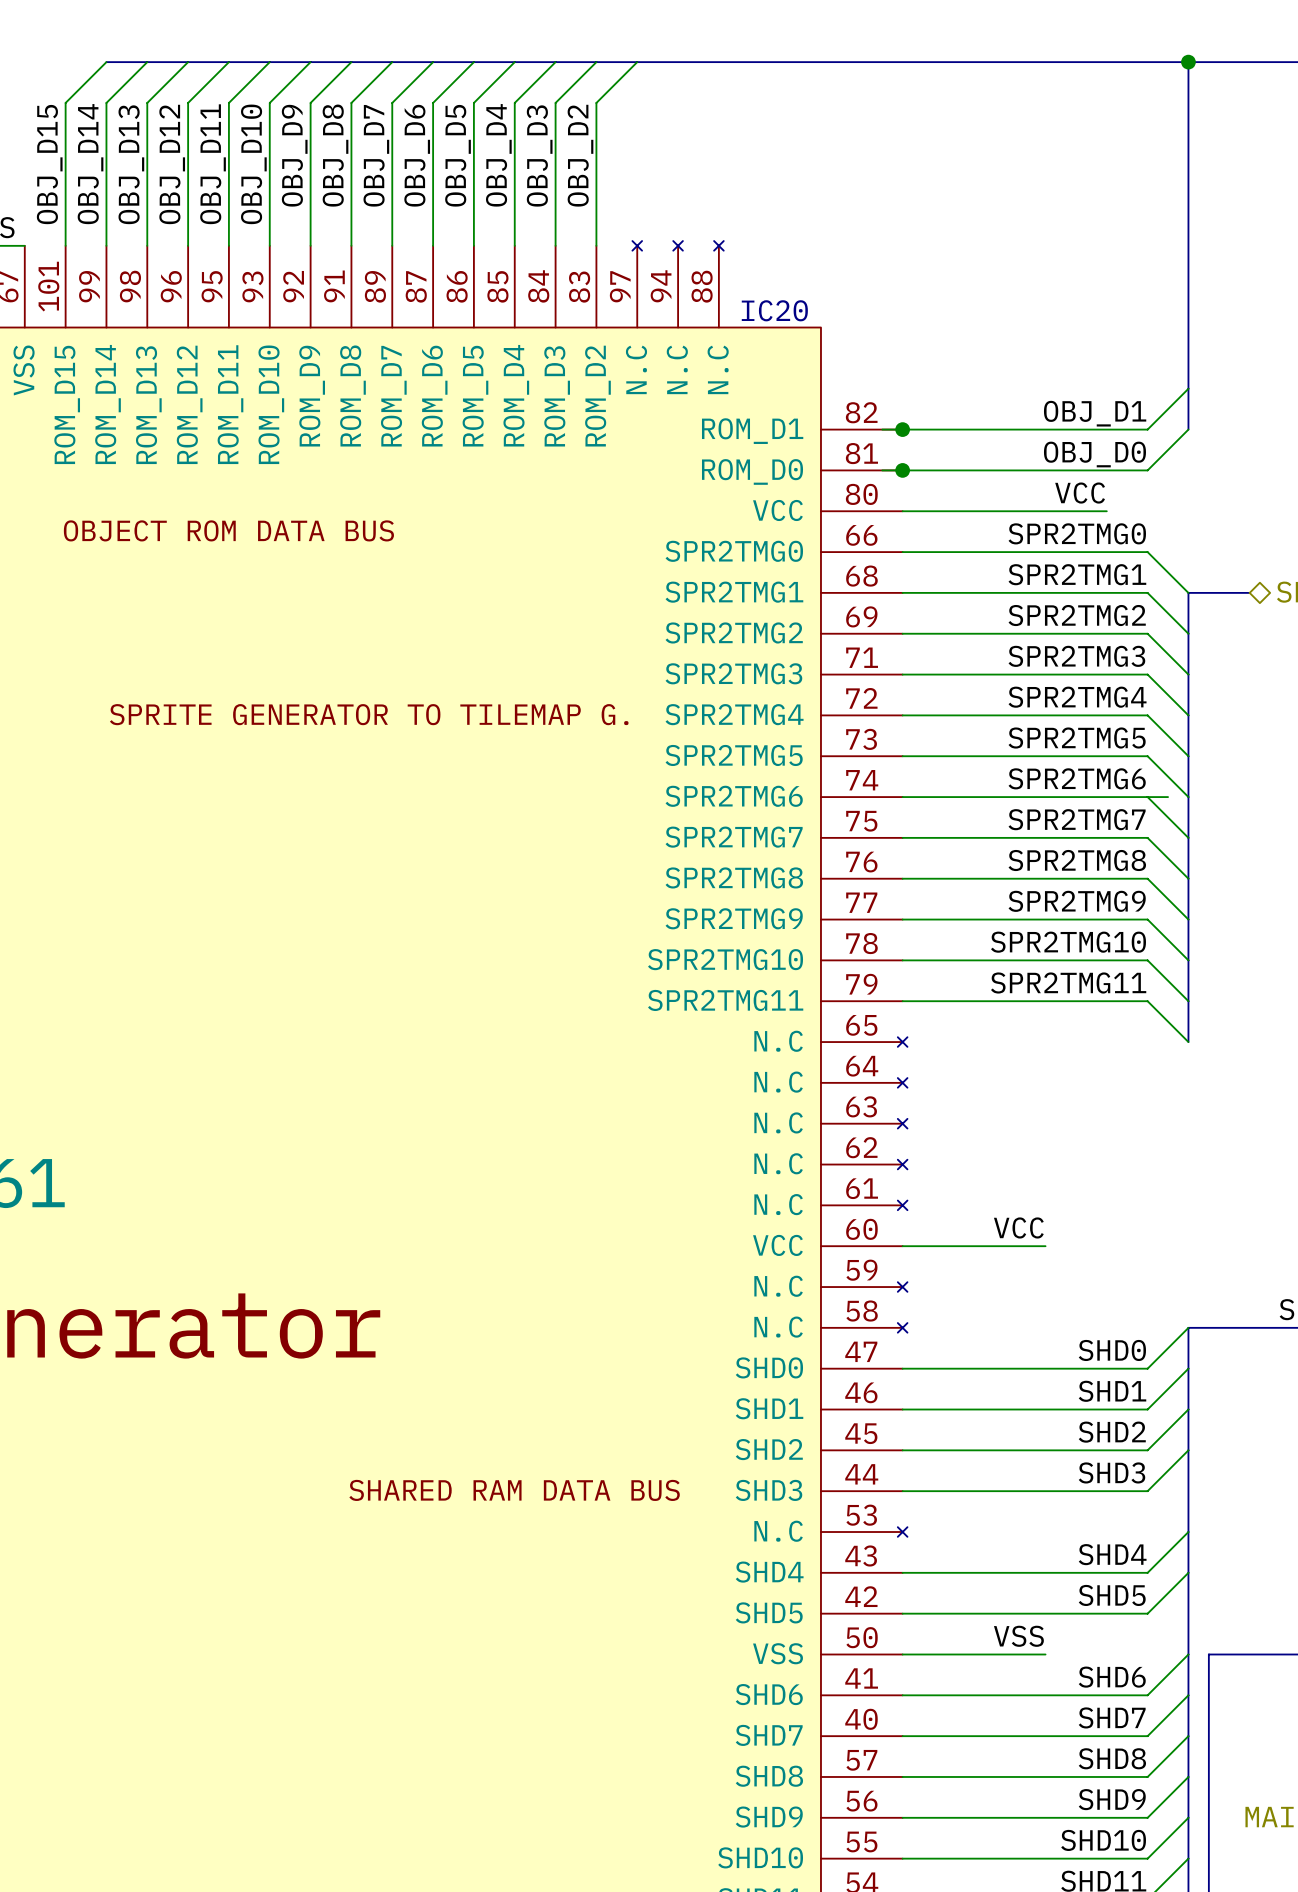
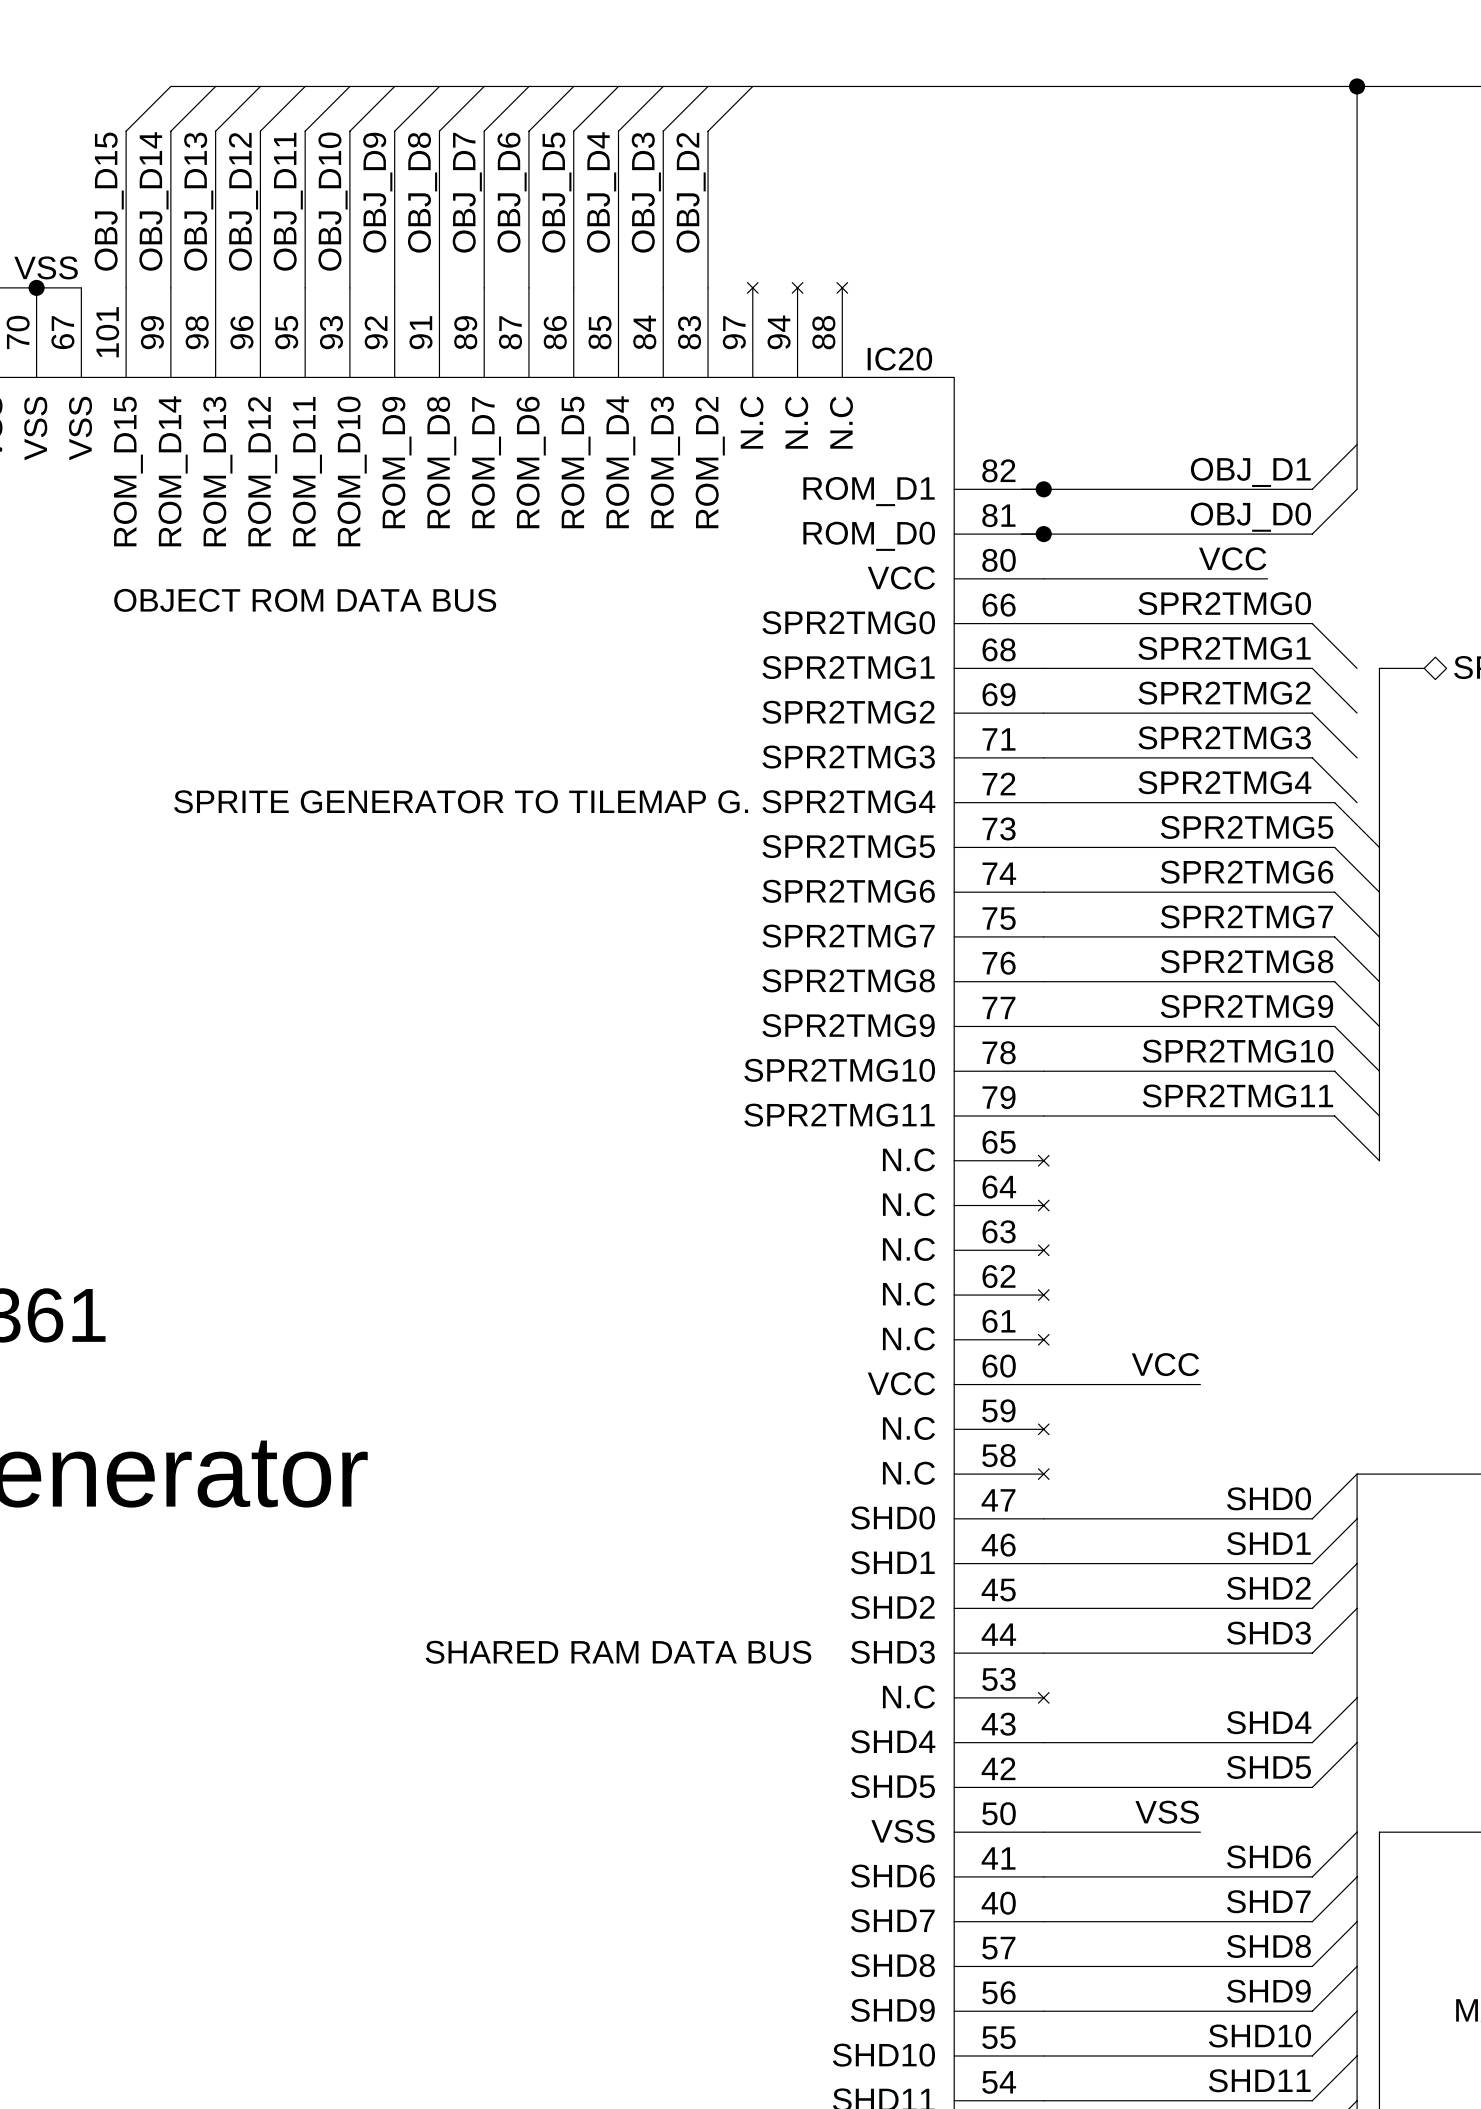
bus: (1208, 592) (1188, 592) (1188, 1042) -> (1379, 668) (1379, 1160)
wire: (1147, 715) (1188, 756) -> (1312, 802) (1334, 802) (1379, 847)
label position: SPR2TMG5 (1077, 738) -> SPR2TMG5 (1247, 827)
wire: (1147, 756) (1188, 797) -> (1312, 847) (1334, 847) (1379, 892)
label position: SPR2TMG6 (1077, 778) -> SPR2TMG6 (1247, 872)
wire: (1147, 797) (1188, 837) -> (1334, 892) (1379, 936)
label position: SPR2TMG7 (1077, 819) -> SPR2TMG7 (1246, 916)
wire: (1147, 837) (1188, 878) -> (1312, 936) (1334, 936) (1379, 981)
label position: SPR2TMG8 (1077, 860) -> SPR2TMG8 (1247, 961)
wire: (1147, 878) (1188, 919) -> (1312, 981) (1334, 981) (1379, 1026)
label position: SPR2TMG9 (1077, 901) -> SPR2TMG9 (1246, 1006)
wire: (1147, 919) (1188, 960) -> (1312, 1026) (1334, 1026) (1379, 1071)
label position: SPR2TMG10 (1068, 942) -> SPR2TMG10 (1238, 1051)
wire: (1147, 960) (1188, 1001) -> (1312, 1071) (1334, 1071) (1379, 1115)
label position: SPR2TMG11 (1068, 982) -> SPR2TMG11 (1237, 1096)
wire: (1147, 1001) (1188, 1042) -> (1312, 1115) (1334, 1115) (1379, 1160)

